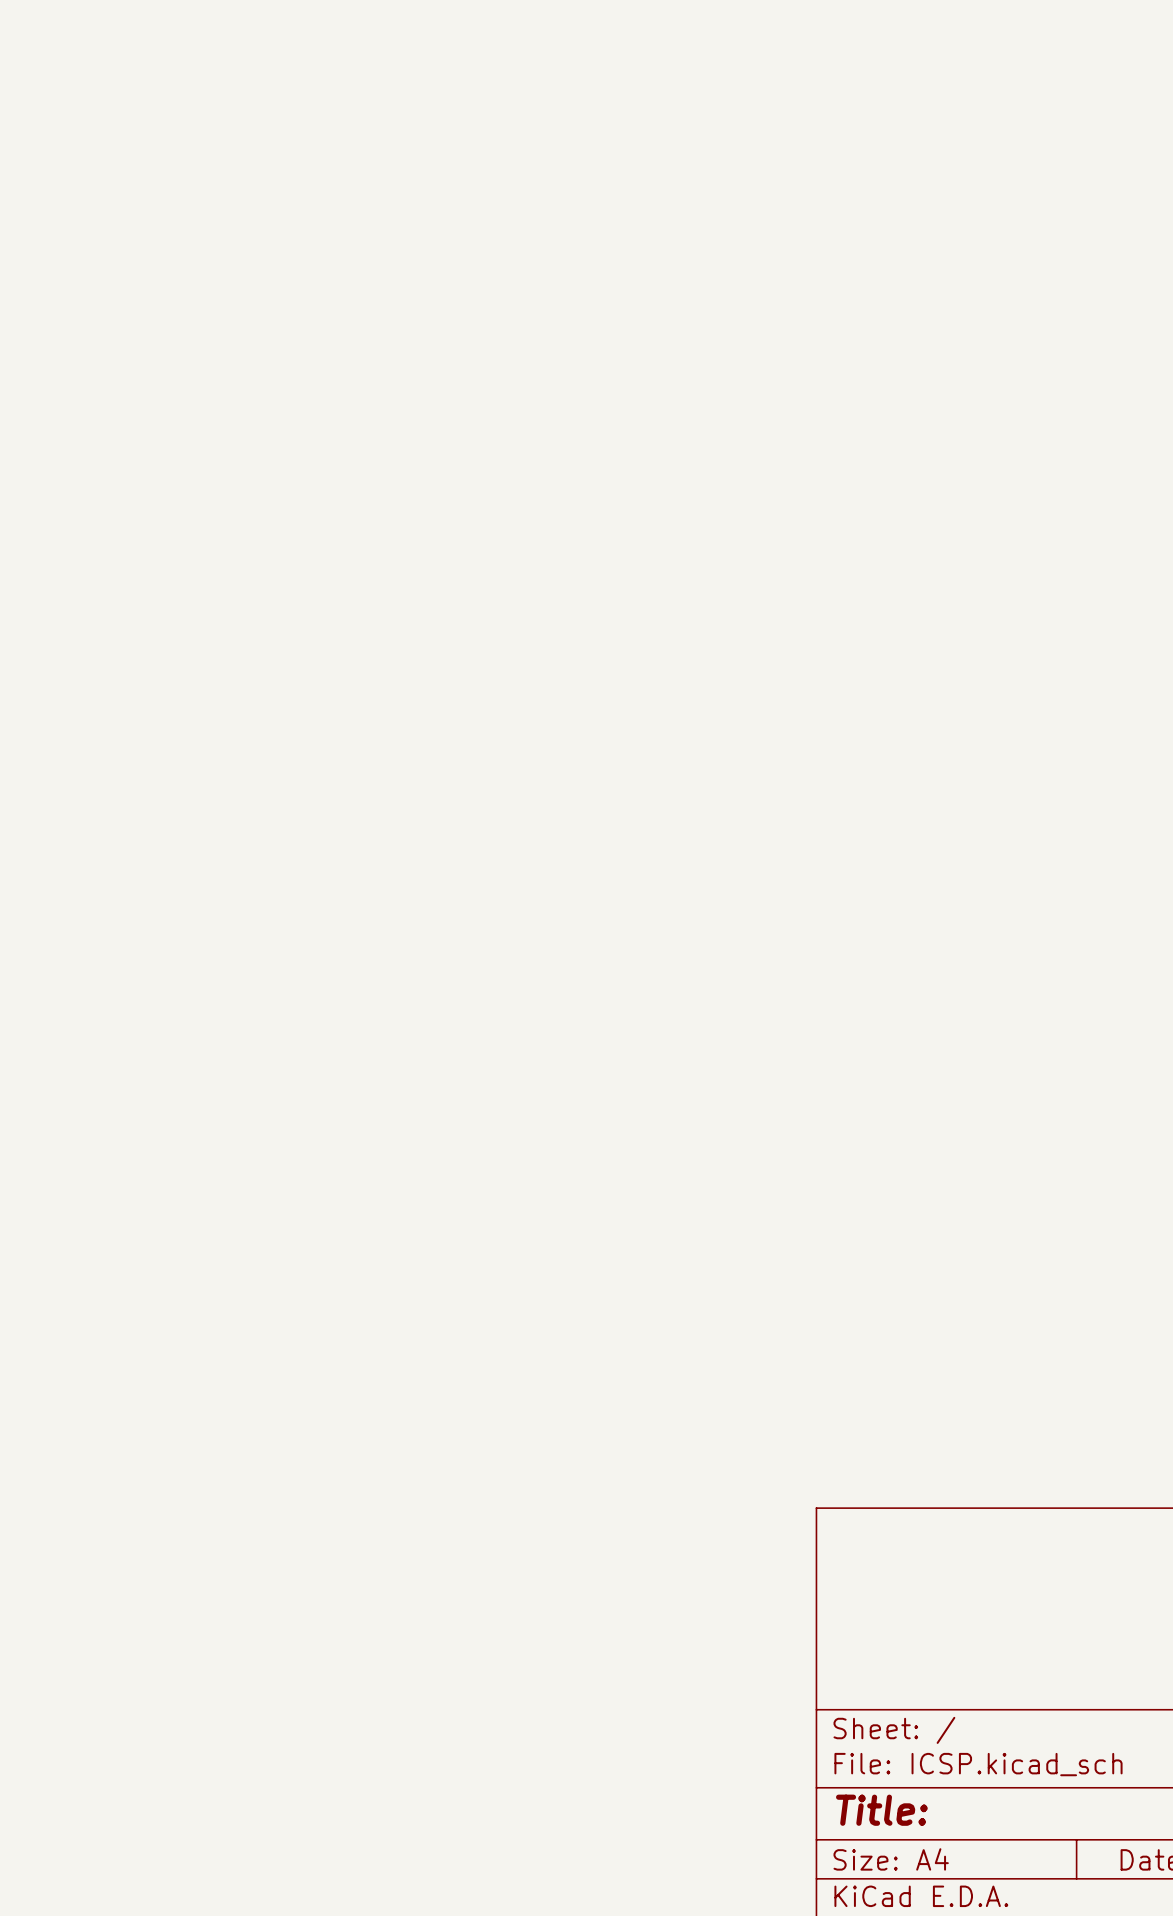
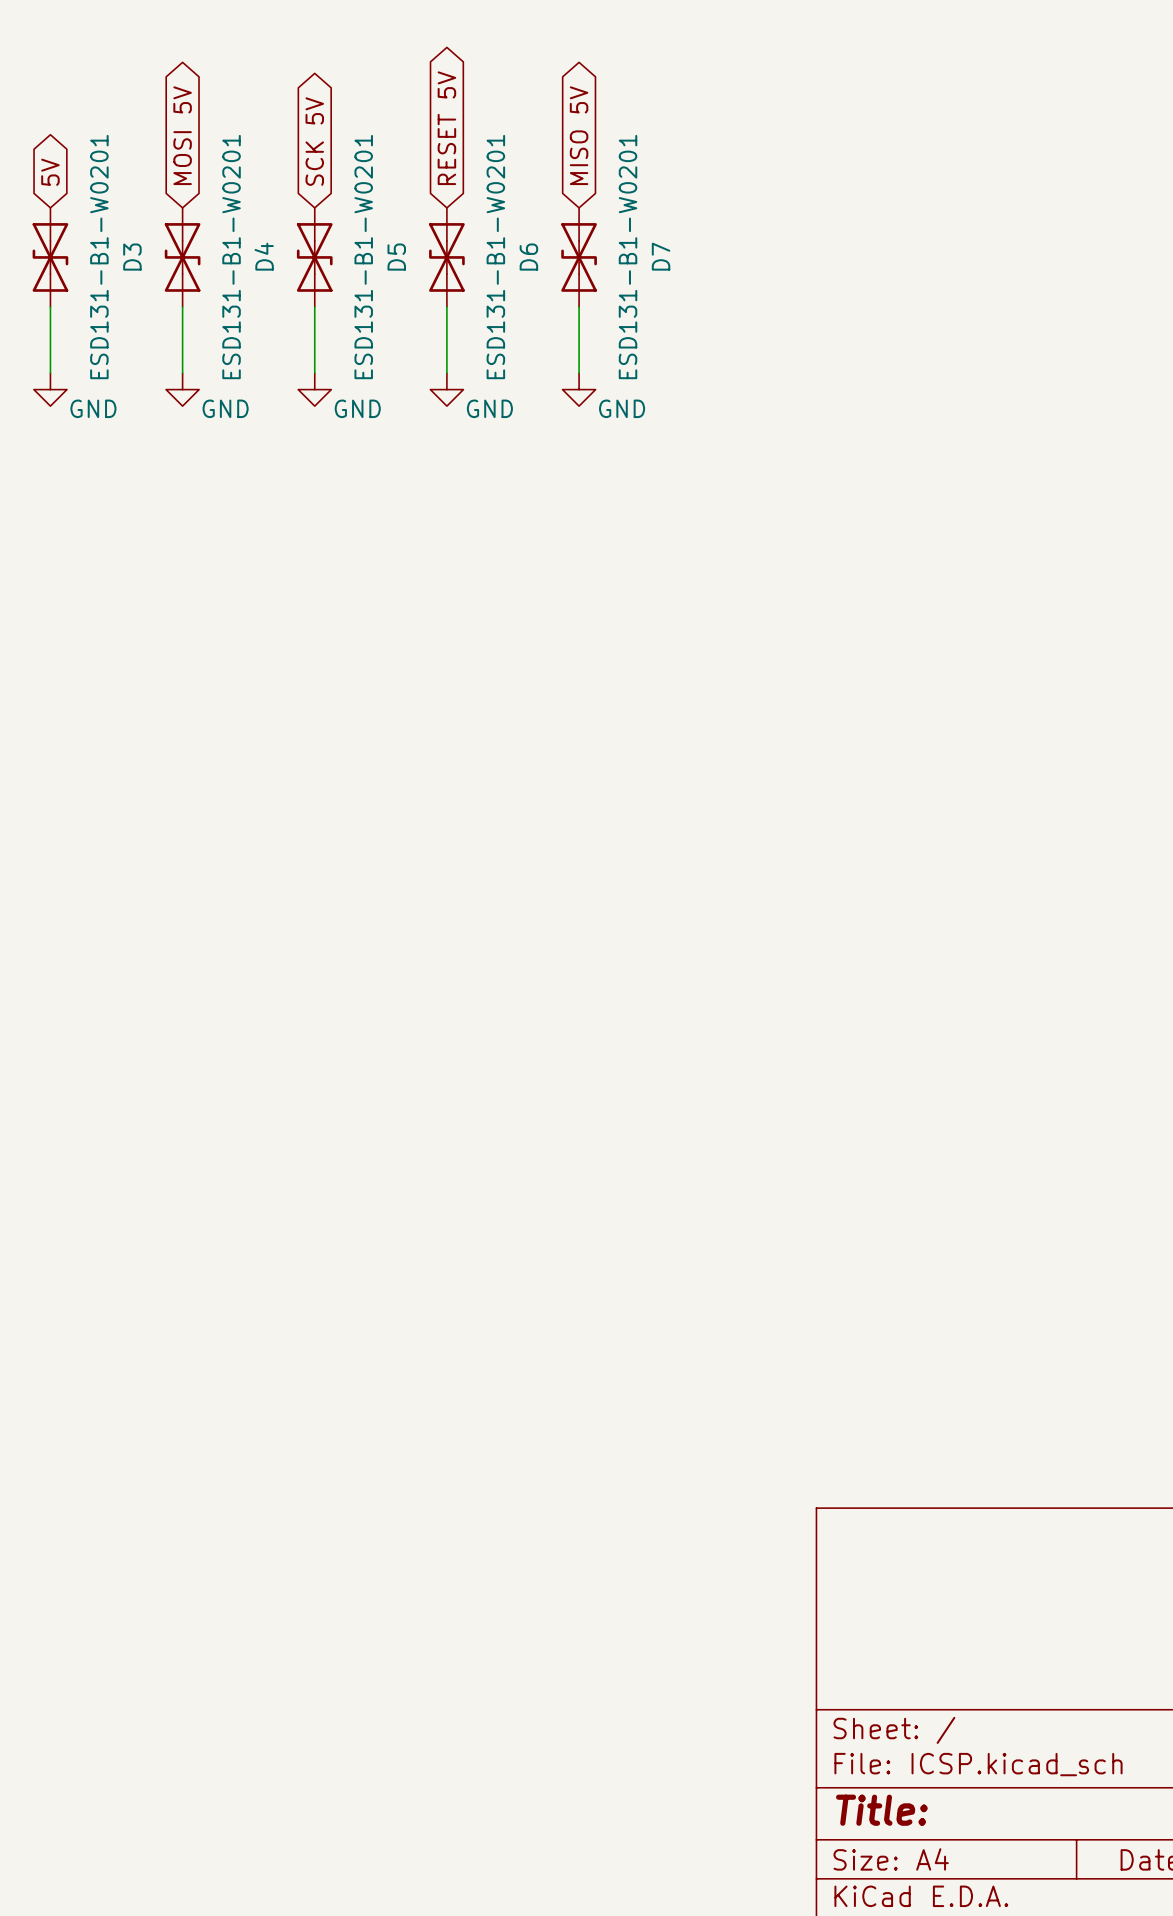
global label: none -> RESET 5V (446, 128)
global label: none -> MOSI 5V (182, 135)
global label: none -> MISO 5V (579, 135)
global label: none -> SCK 5V (314, 141)
global label: none -> 5V (50, 172)
D3: none -> ESD131-B1-W0201 (50, 257)
D4: none -> ESD131-B1-W0201 (182, 257)
D5: none -> ESD131-B1-W0201 (314, 257)
D6: none -> ESD131-B1-W0201 (446, 257)
D7: none -> ESD131-B1-W0201 (579, 257)
wire: none -> (50, 307) (50, 373)
wire: none -> (182, 307) (182, 373)
wire: none -> (314, 307) (314, 373)
wire: none -> (446, 307) (446, 373)
wire: none -> (579, 307) (579, 373)
power symbol: none -> GND (50, 389)
power symbol: none -> GND (182, 389)
power symbol: none -> GND (314, 389)
power symbol: none -> GND (446, 389)
power symbol: none -> GND (579, 389)

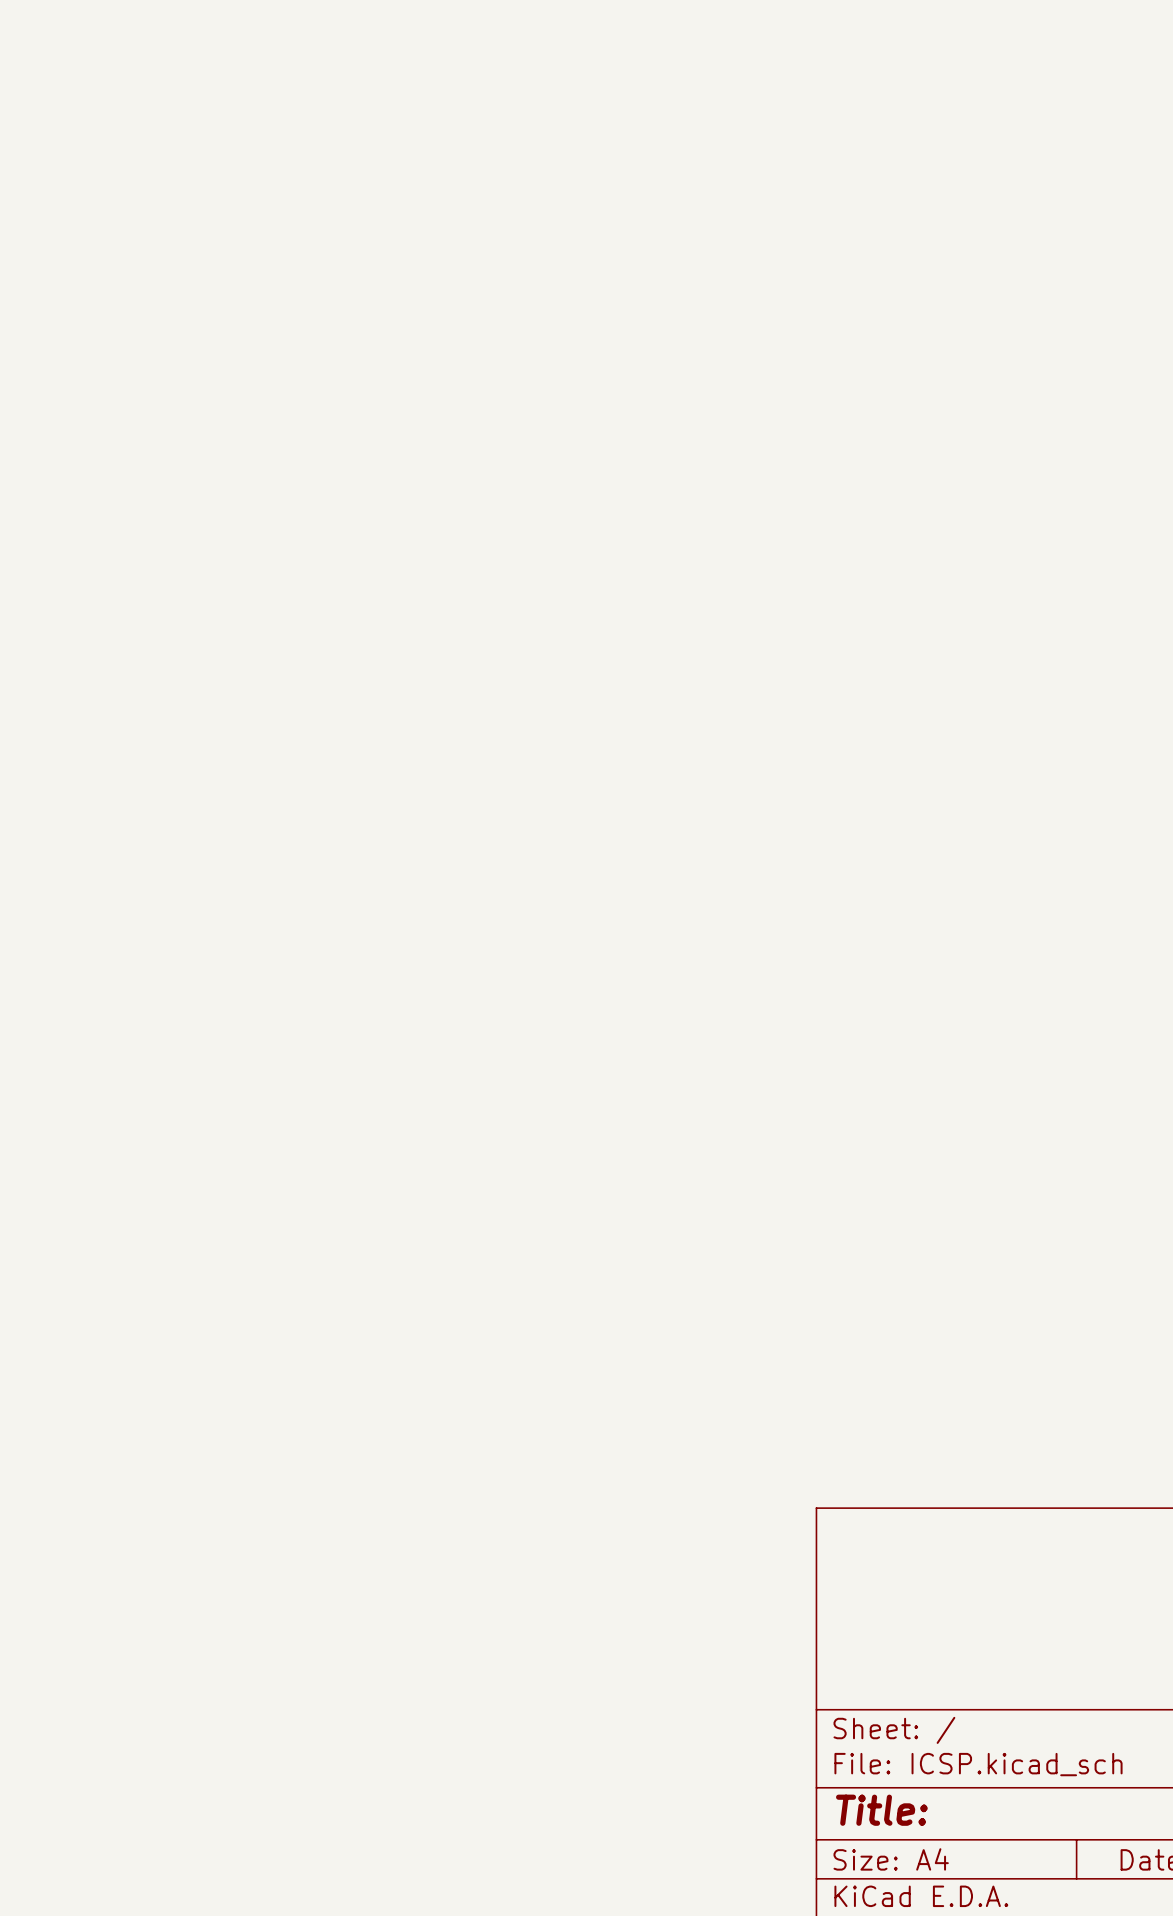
global label: RESET 5V (446, 128) -> none
global label: MOSI 5V (182, 135) -> none
global label: MISO 5V (579, 135) -> none
global label: SCK 5V (314, 141) -> none
global label: 5V (50, 172) -> none
D3: ESD131-B1-W0201 (50, 257) -> none
D4: ESD131-B1-W0201 (182, 257) -> none
D5: ESD131-B1-W0201 (314, 257) -> none
D6: ESD131-B1-W0201 (446, 257) -> none
D7: ESD131-B1-W0201 (579, 257) -> none
wire: (50, 307) (50, 373) -> none
wire: (182, 307) (182, 373) -> none
wire: (314, 307) (314, 373) -> none
wire: (446, 307) (446, 373) -> none
wire: (579, 307) (579, 373) -> none
power symbol: GND (50, 389) -> none
power symbol: GND (182, 389) -> none
power symbol: GND (314, 389) -> none
power symbol: GND (446, 389) -> none
power symbol: GND (579, 389) -> none

